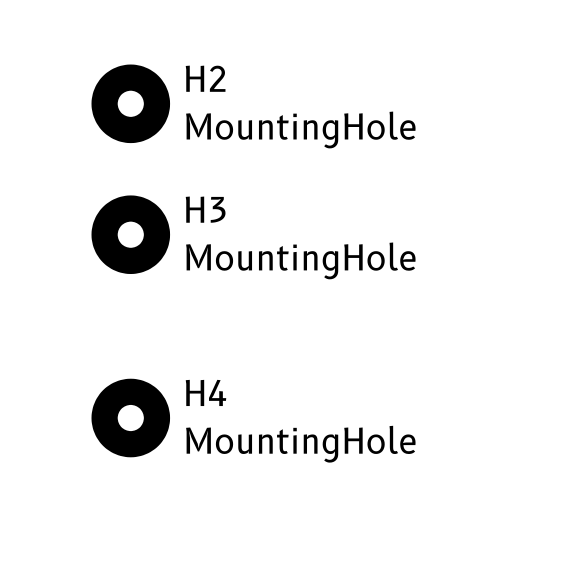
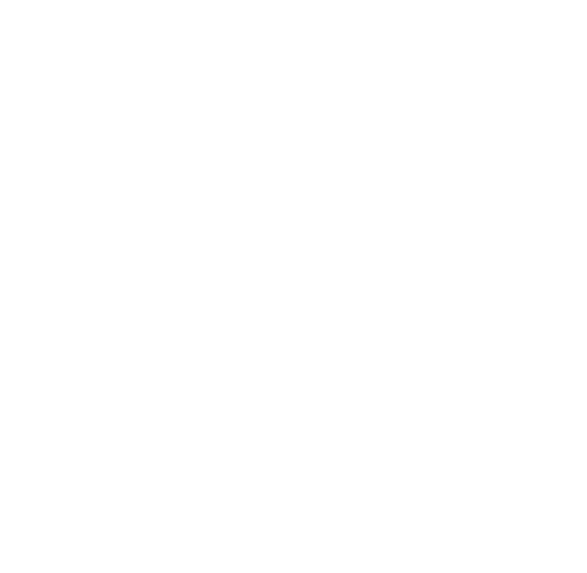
H2: MountingHole (130, 103) -> none
H3: MountingHole (130, 234) -> none
H4: MountingHole (130, 418) -> none

